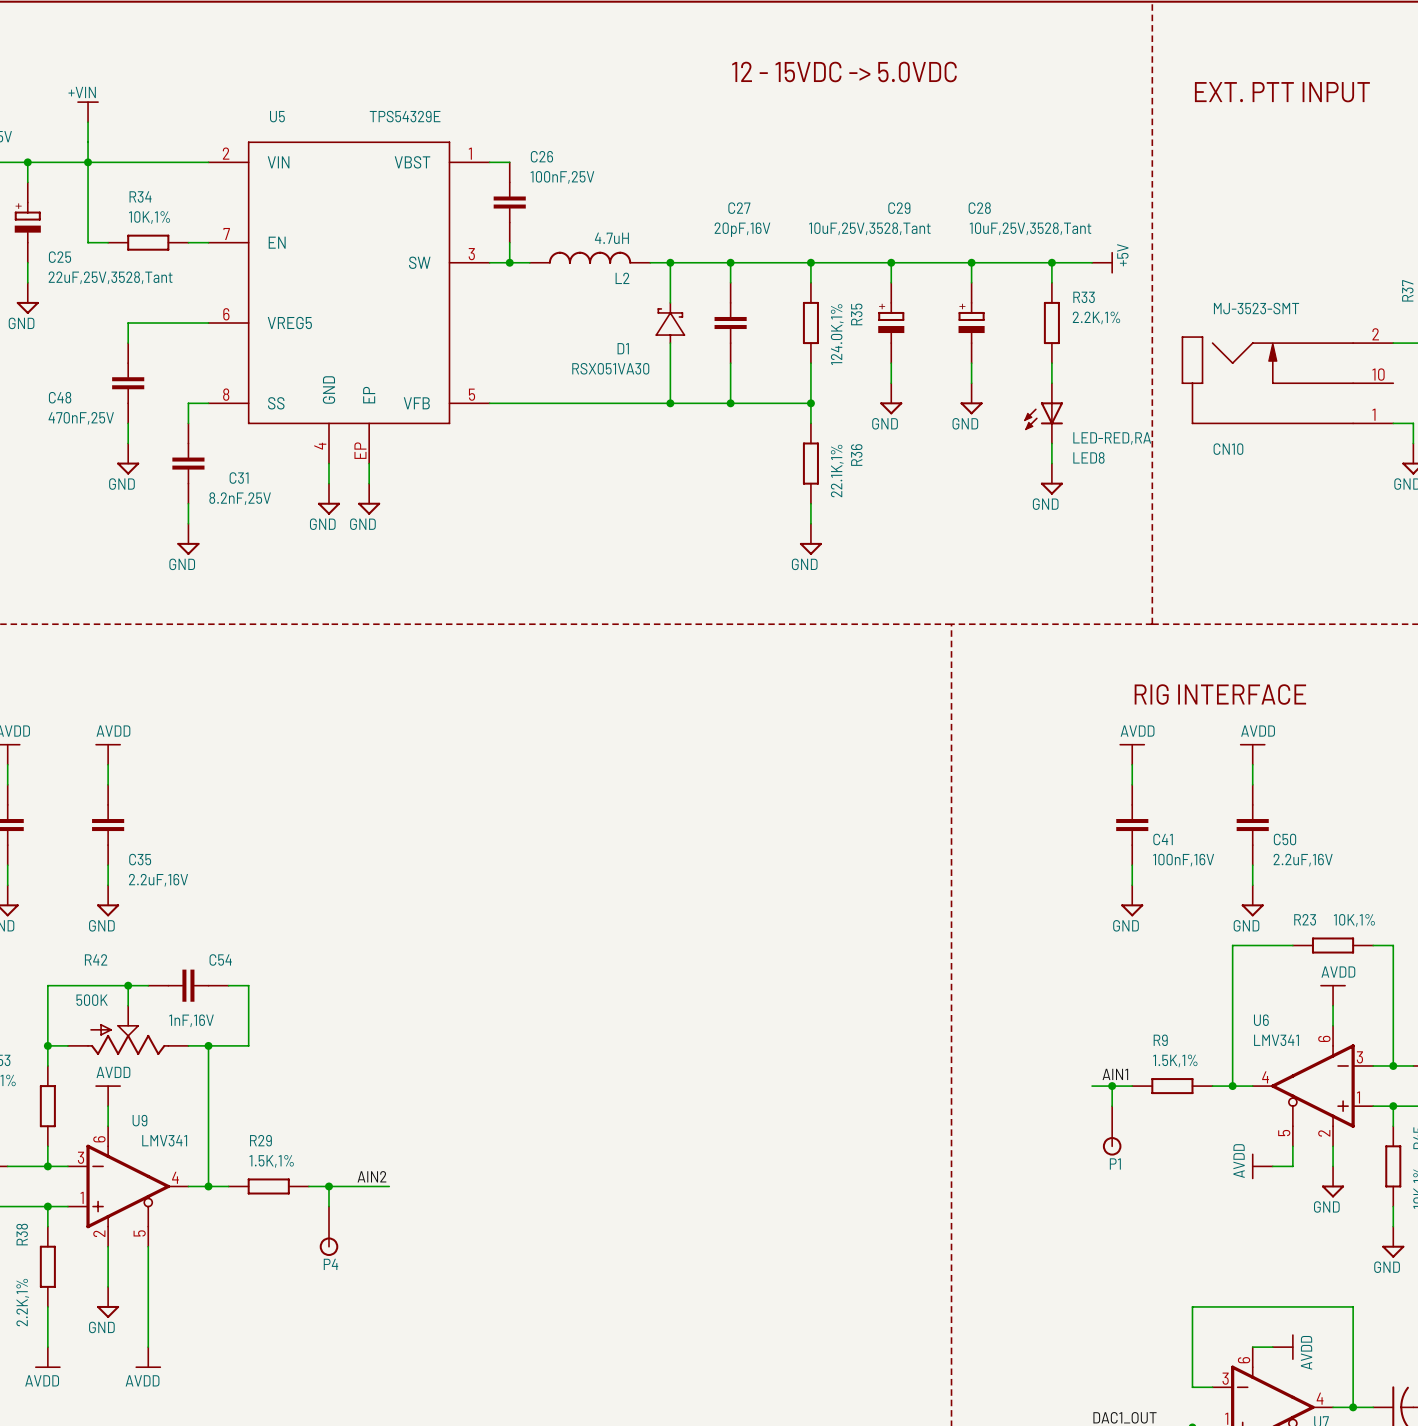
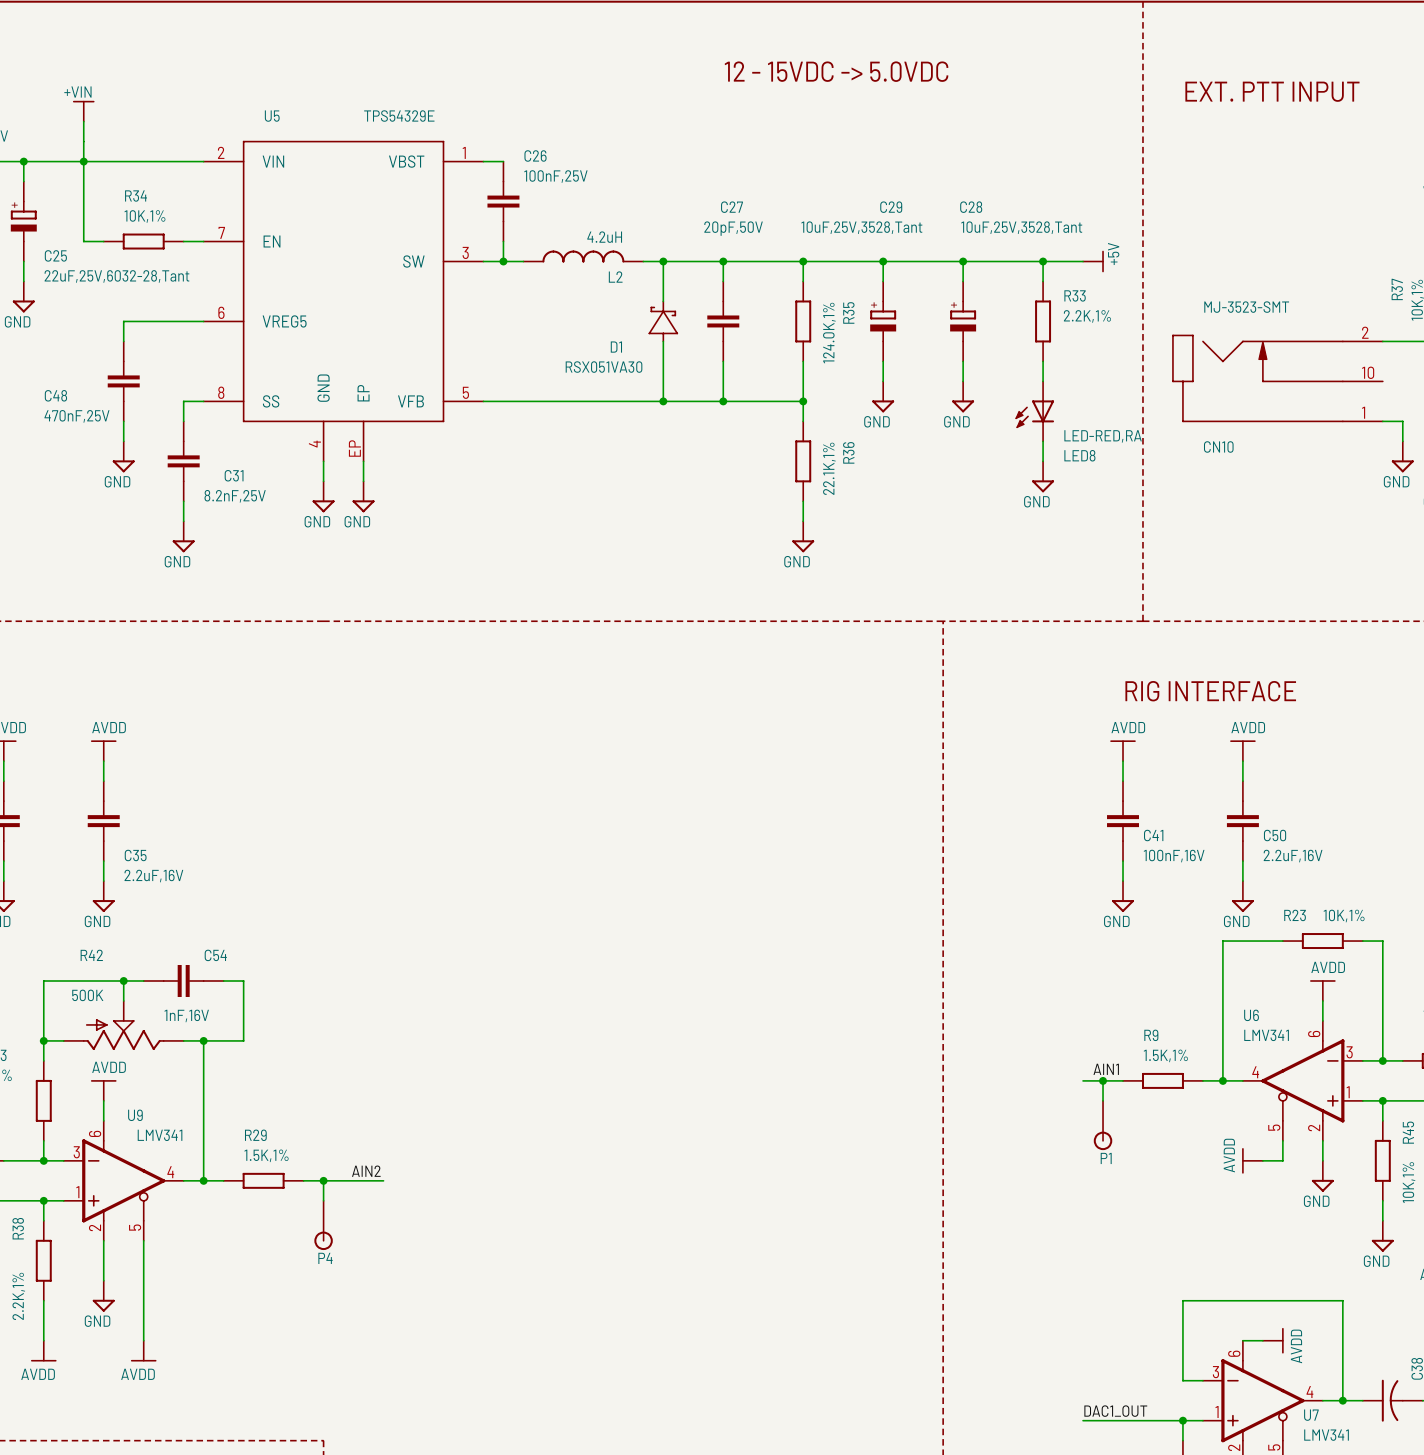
C27 value: 20pF,16V (742, 229) -> 20pF,50V (733, 228)
L2 value: 4.7uH (611, 238) -> 4.2uH (604, 237)
C25 value: 22uF,25V,3528,Tant (110, 277) -> 22uF,25V,6032-28,Tant (116, 276)

